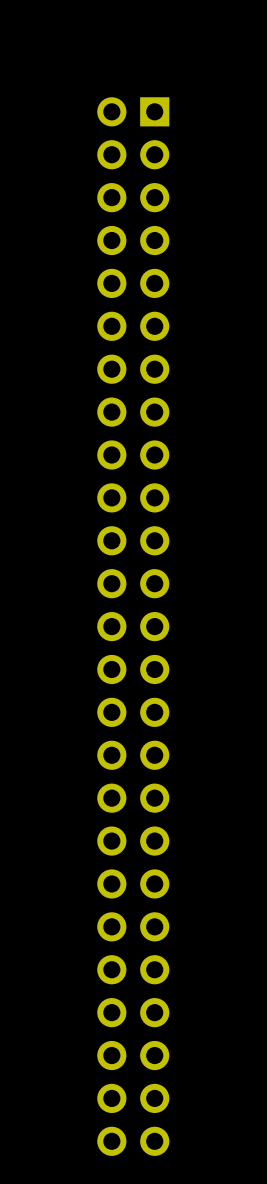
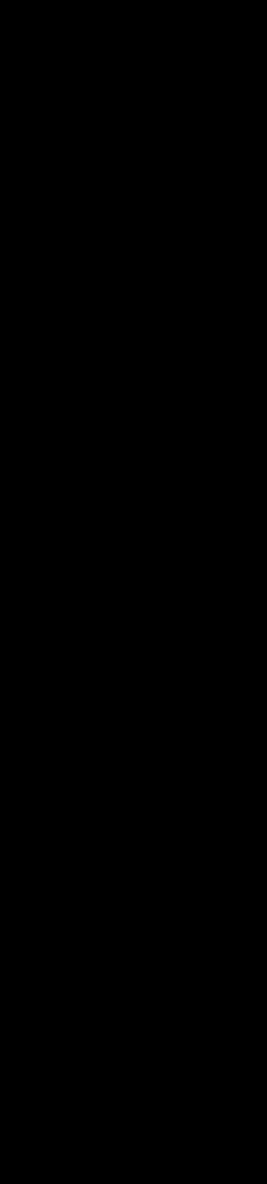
part: (133, 626) -> none

